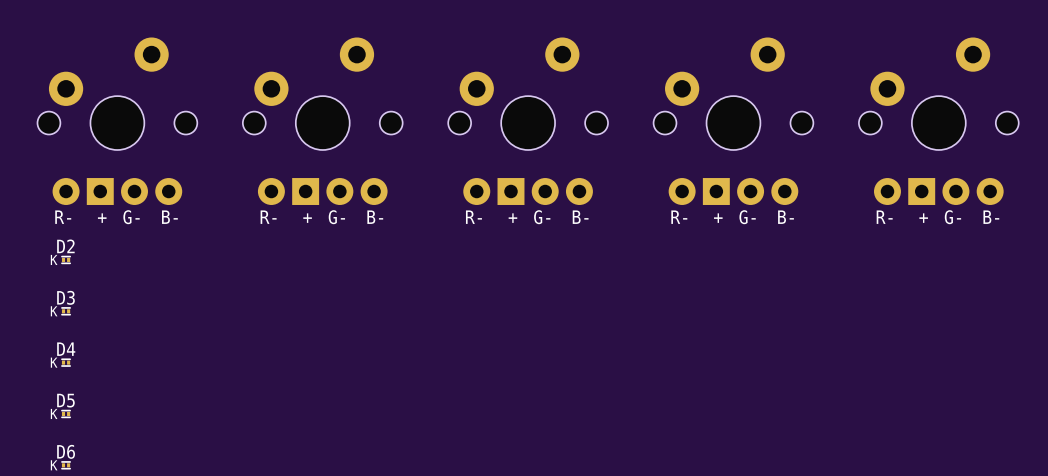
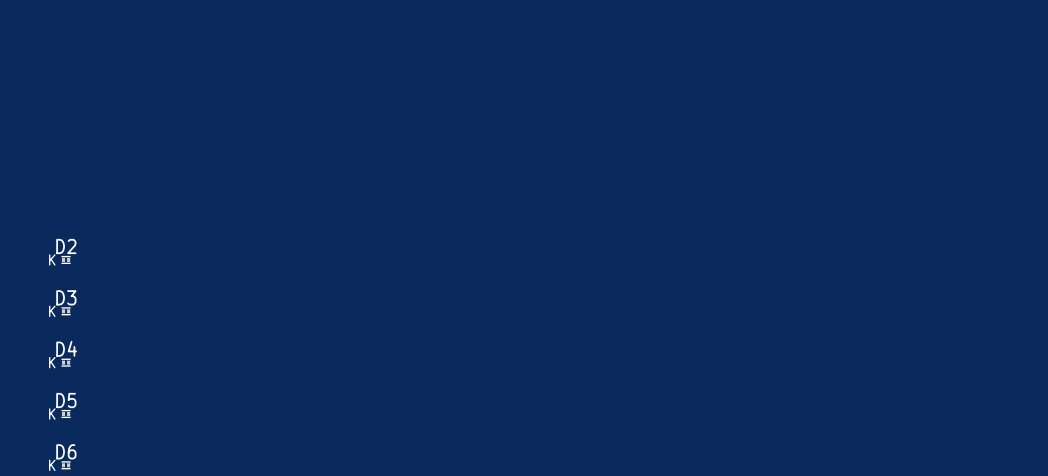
part: (117, 121) -> none
part: (322, 121) -> none
part: (528, 121) -> none
part: (733, 121) -> none
part: (938, 121) -> none

